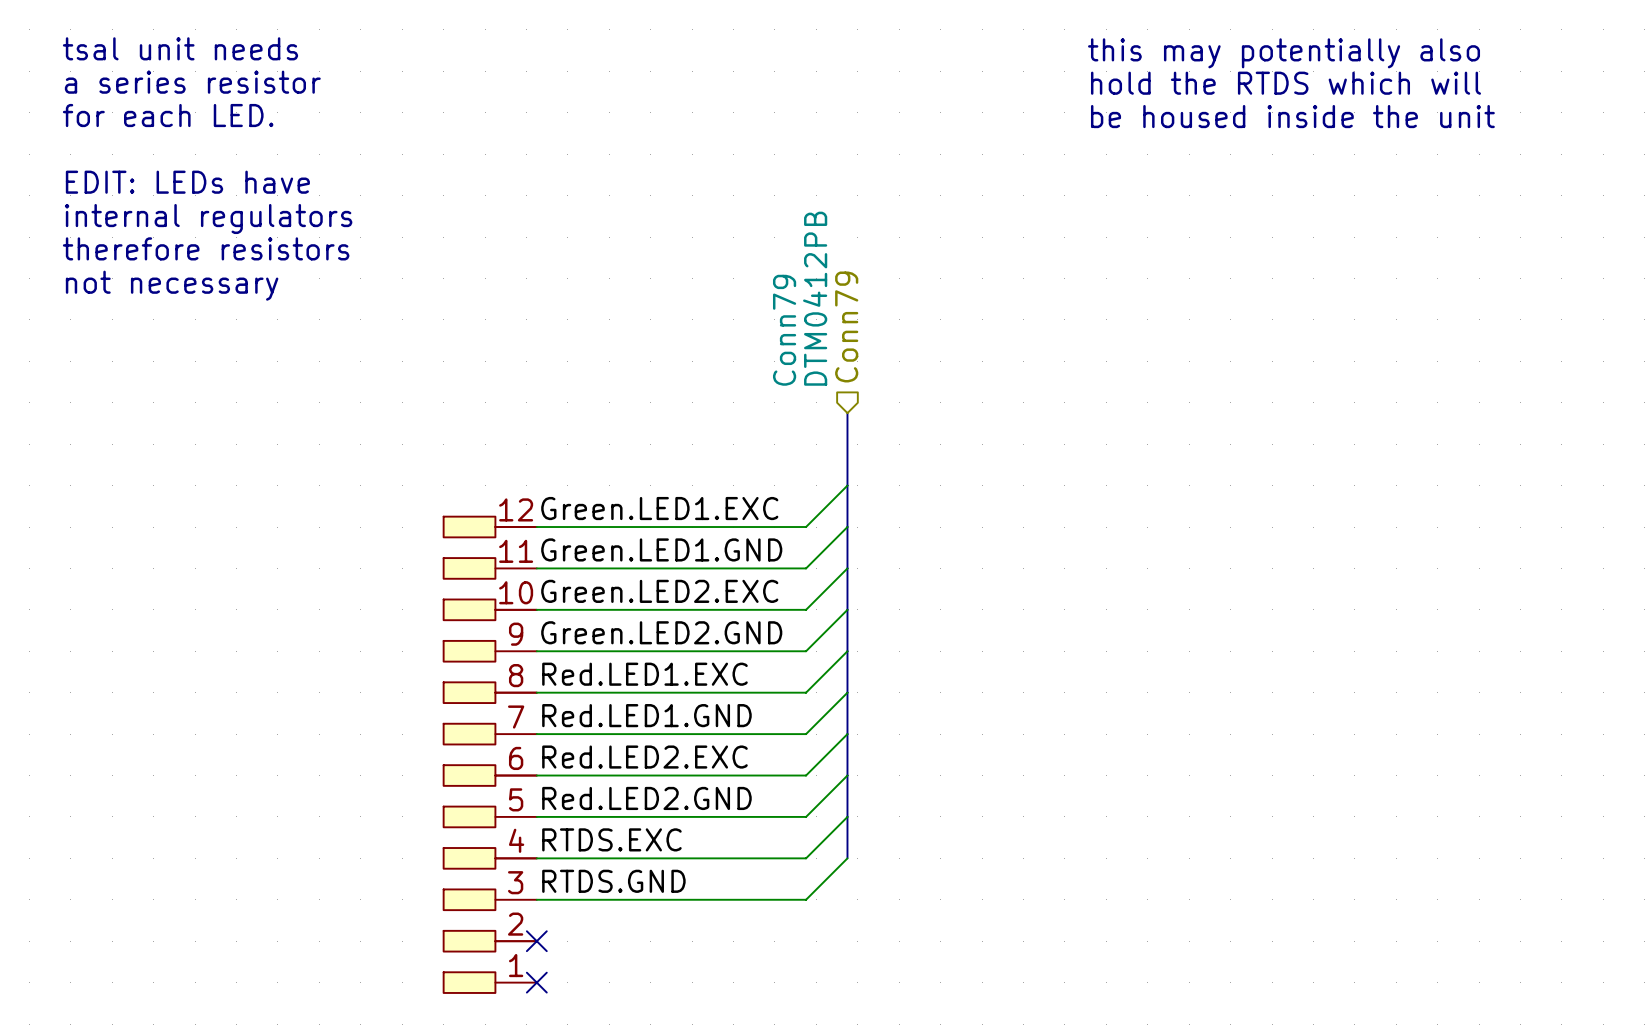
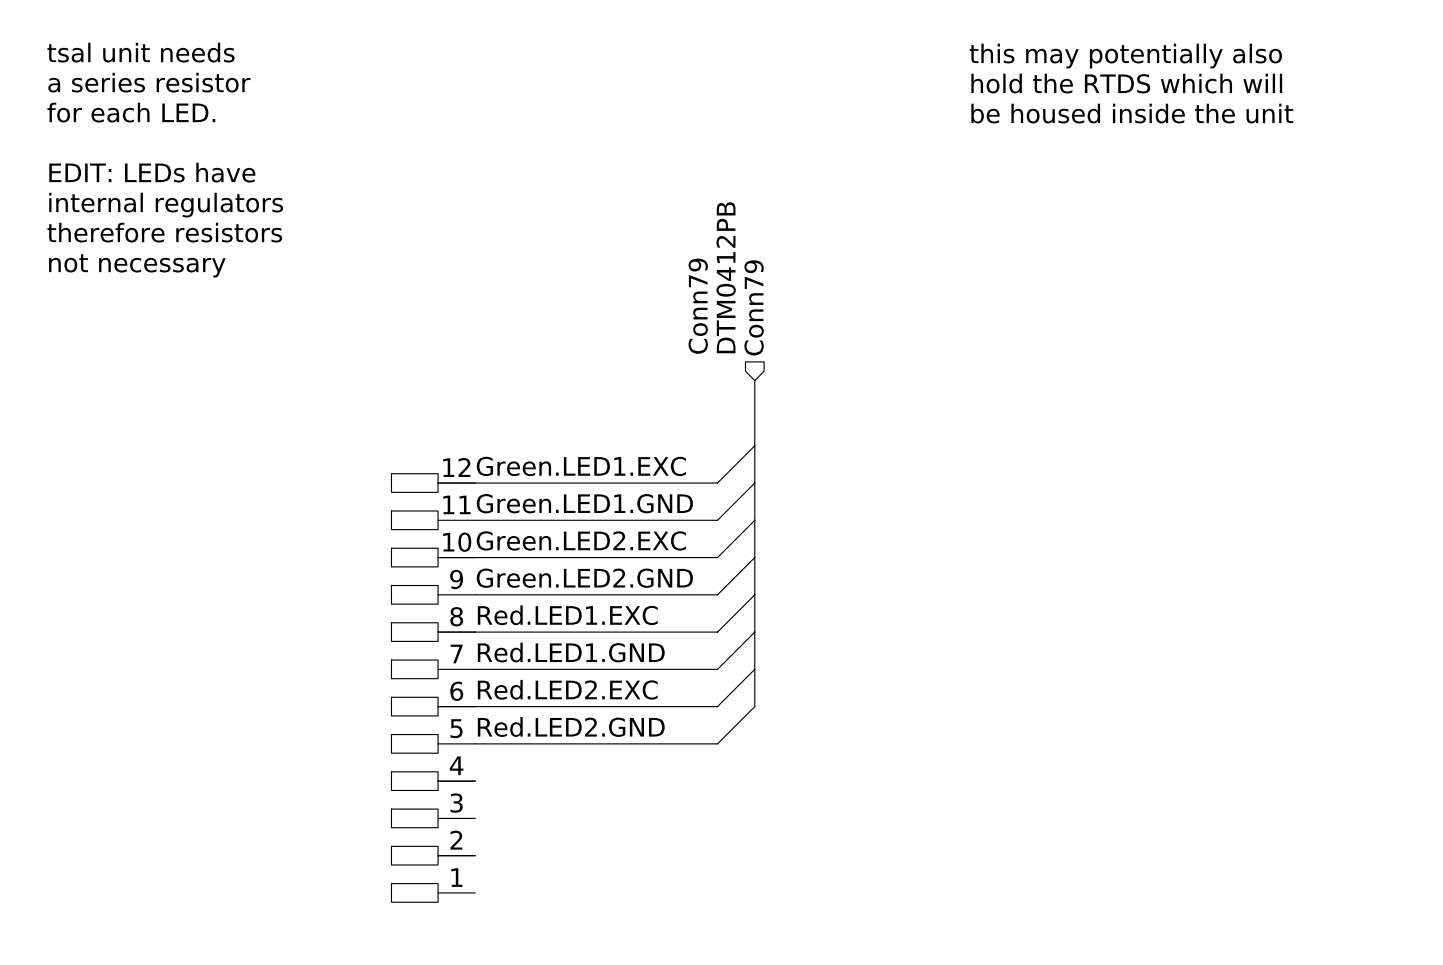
bus: (847, 775) (847, 858) -> none
wire: (847, 816) (806, 858) (536, 858) -> none
label: RTDS.EXC (611, 839) -> none
wire: (847, 858) (806, 899) (536, 899) -> none
label: RTDS.GND (613, 881) -> none
no-connect mark: (536, 941) -> none
no-connect mark: (536, 982) -> none

